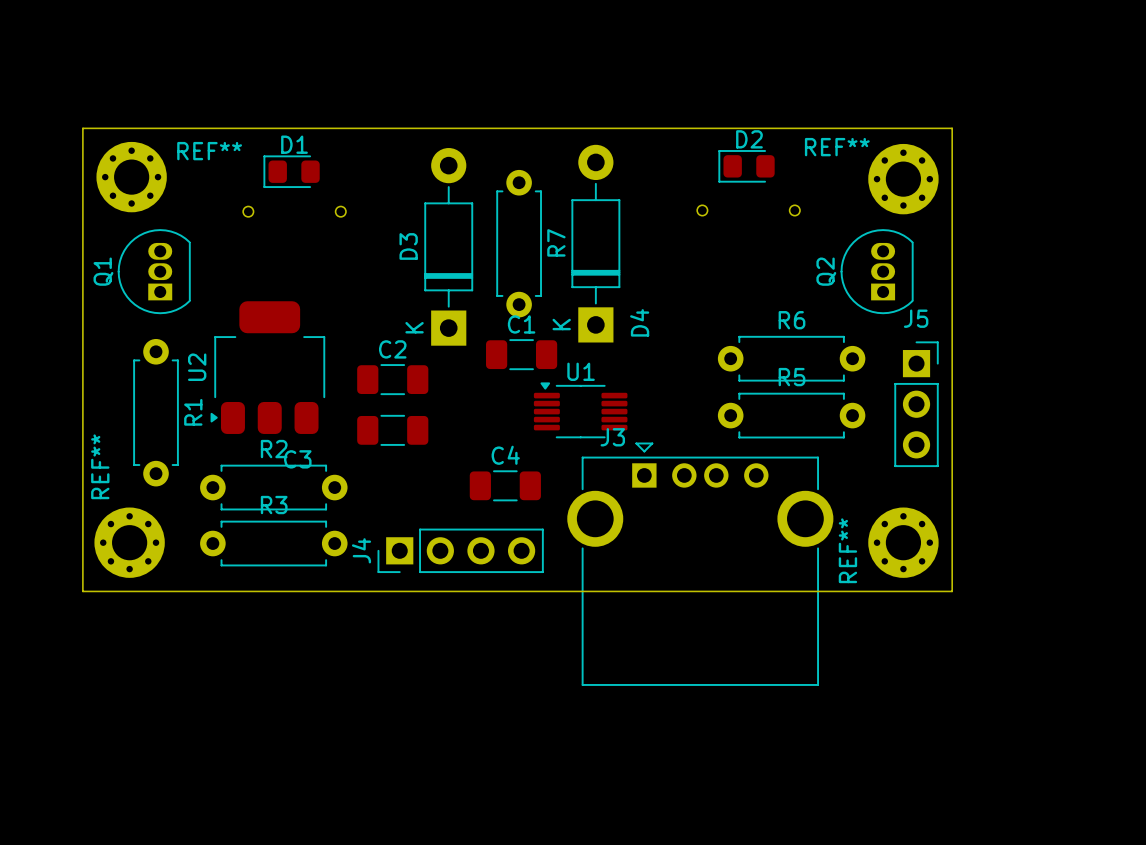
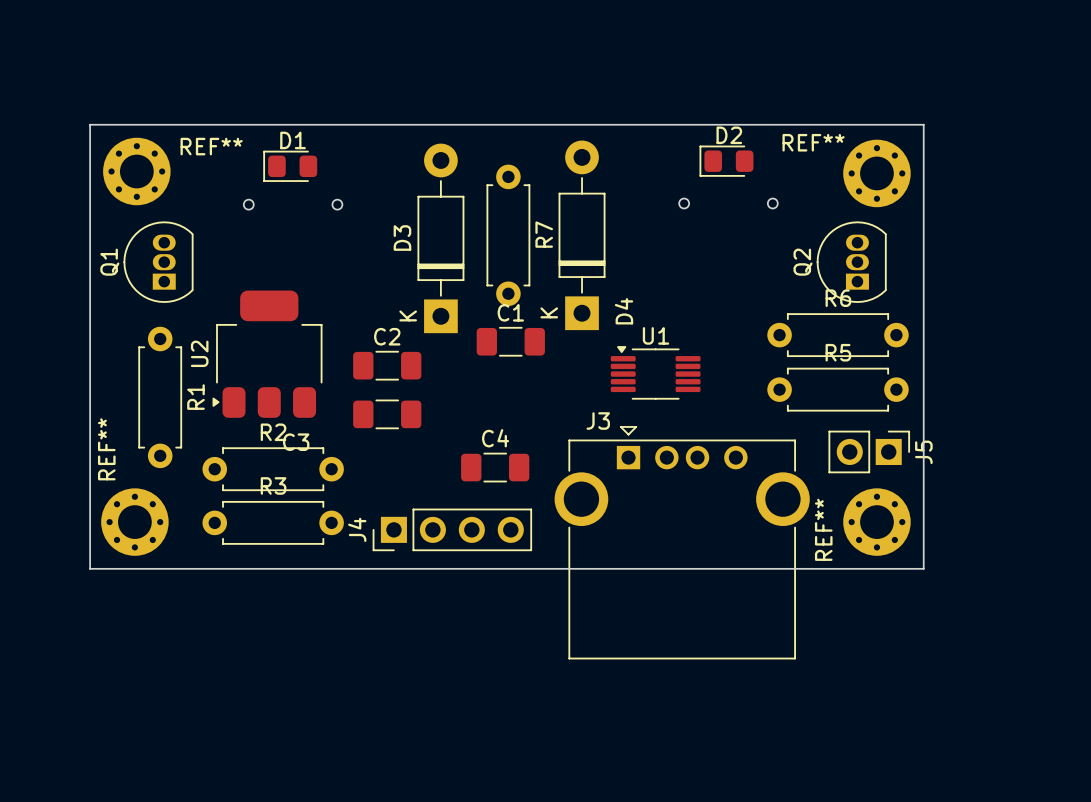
J5 name position: J5 (916, 318) -> J5 (923, 452)
J5 footprint: [894, 341, 939, 468] -> [828, 430, 911, 474]
R6 position: (791, 358) -> (838, 335)
U1 position: (580, 410) -> (655, 372)
R5 position: (791, 415) -> (838, 389)

